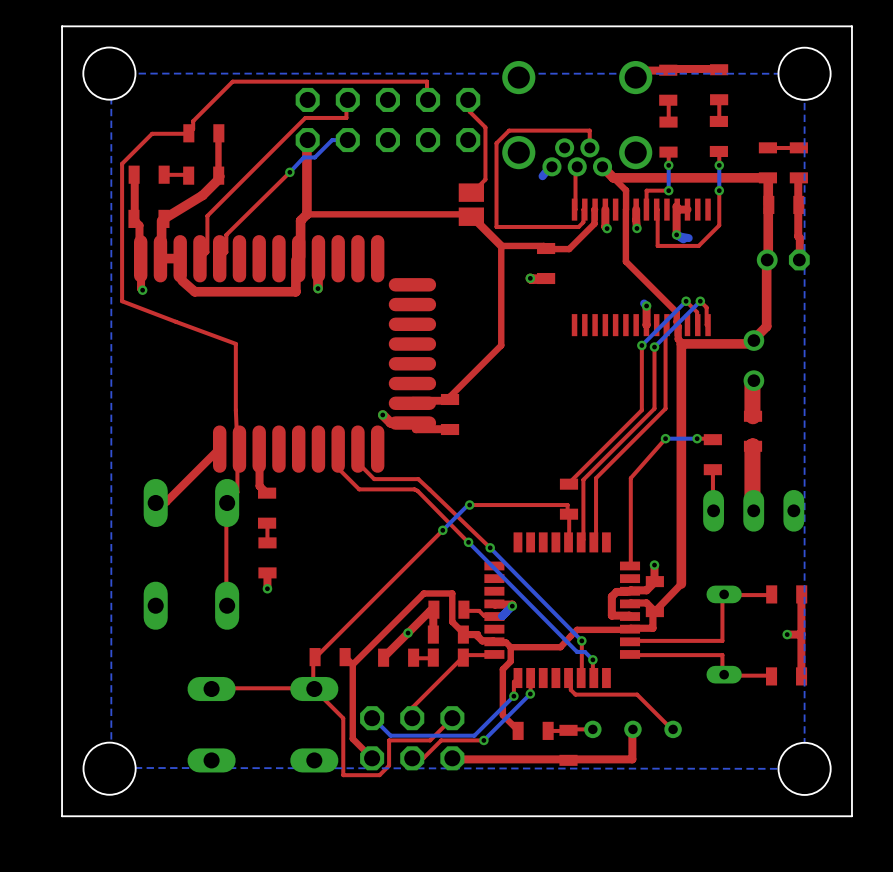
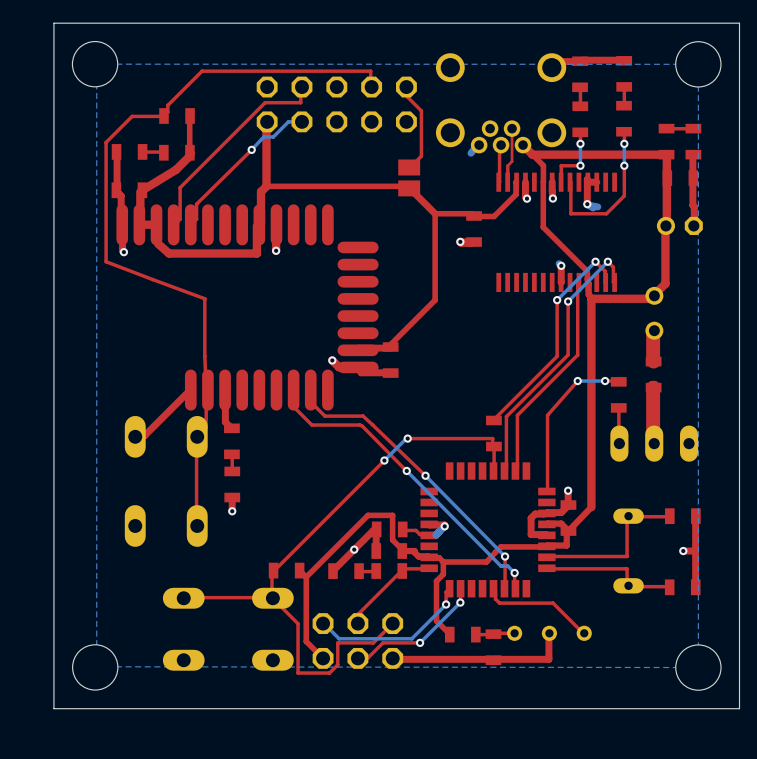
top track: (589, 147) (589, 130) (509, 130) (496, 143) (496, 226) (578, 226) (583, 222) (584, 209) -> (512, 128) (512, 161) (507, 165) (507, 182)

